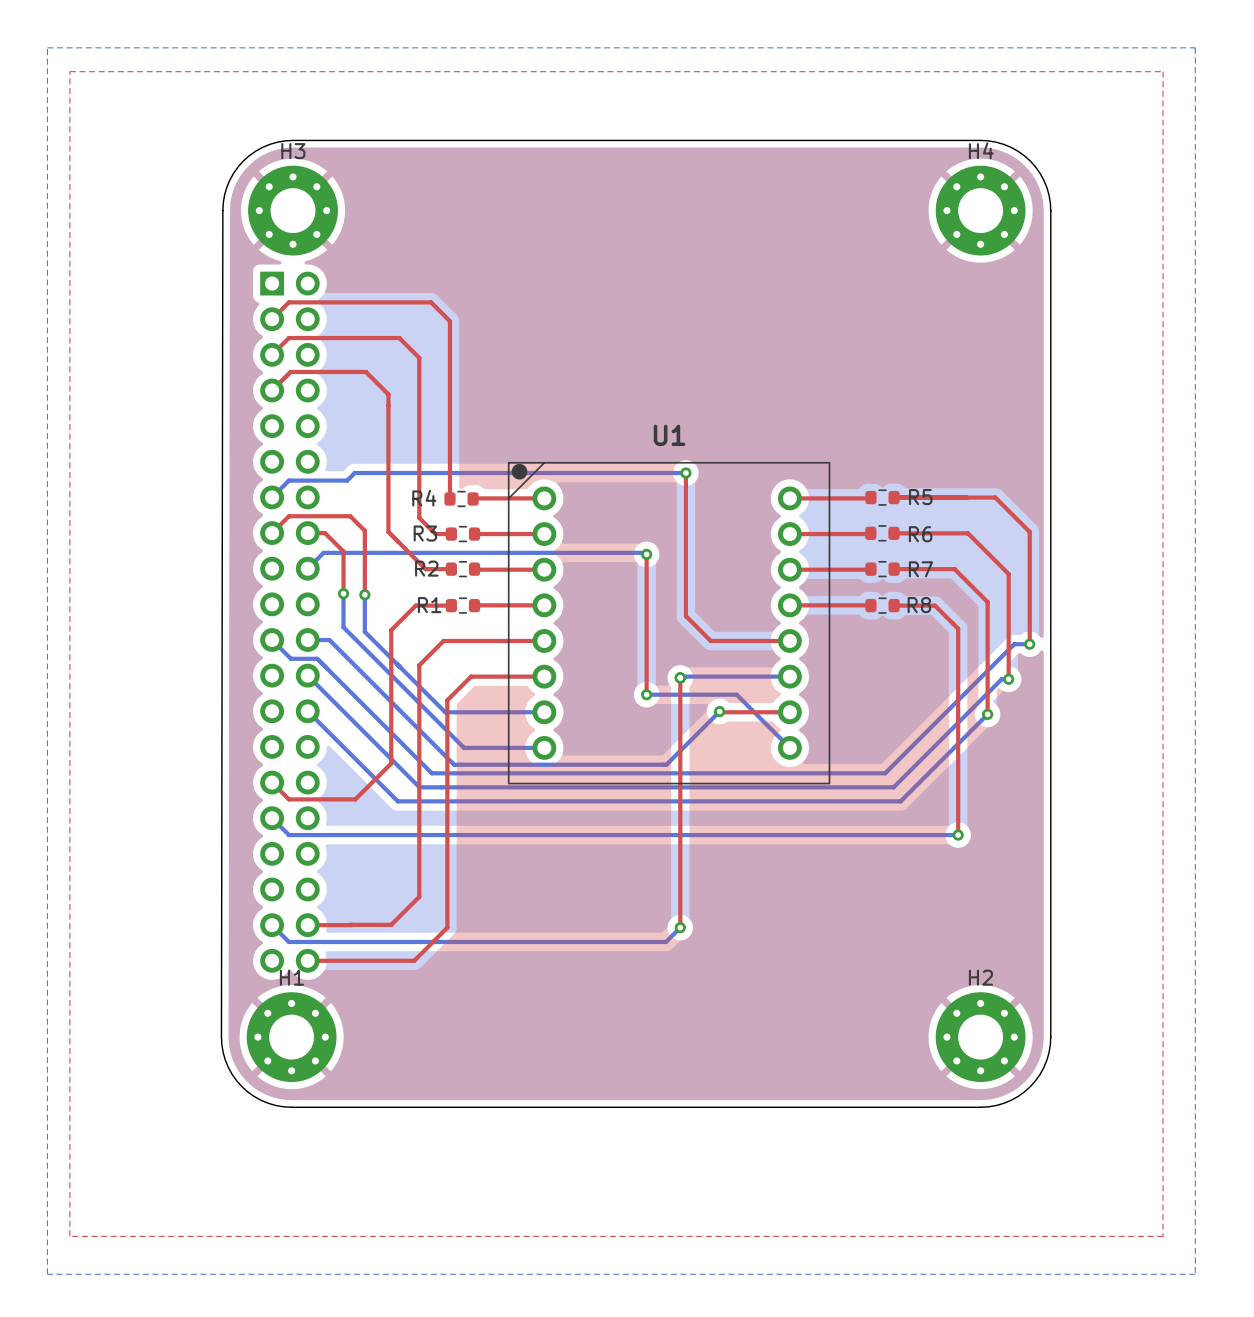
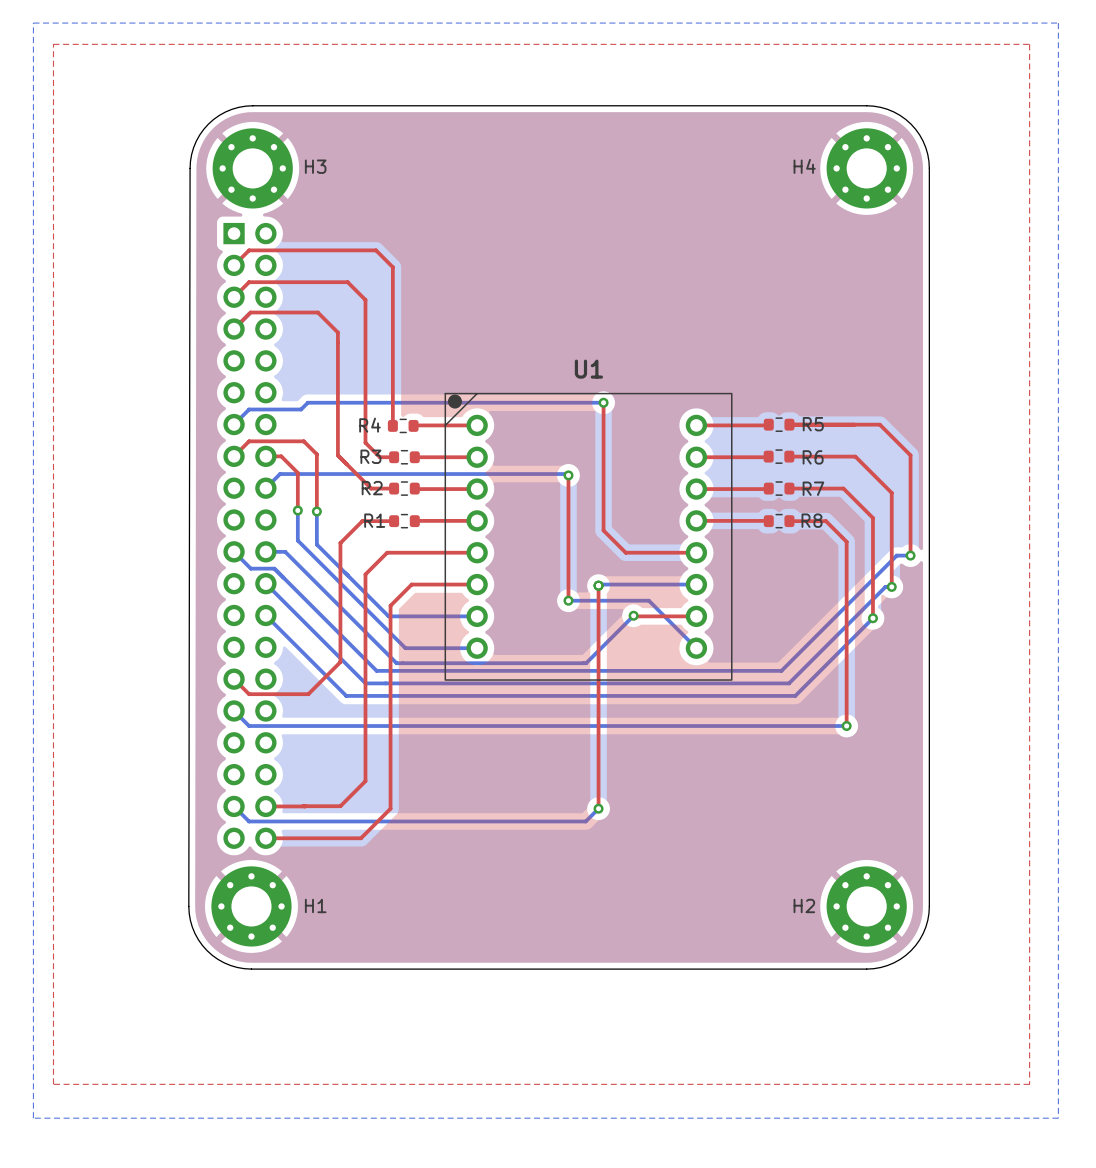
H4 name position: H4 (981, 150) -> H4 (804, 166)
H3 name position: H3 (293, 151) -> H3 (315, 166)
H1 name position: H1 (291, 977) -> H1 (315, 905)
H2 name position: H2 (980, 977) -> H2 (804, 905)

